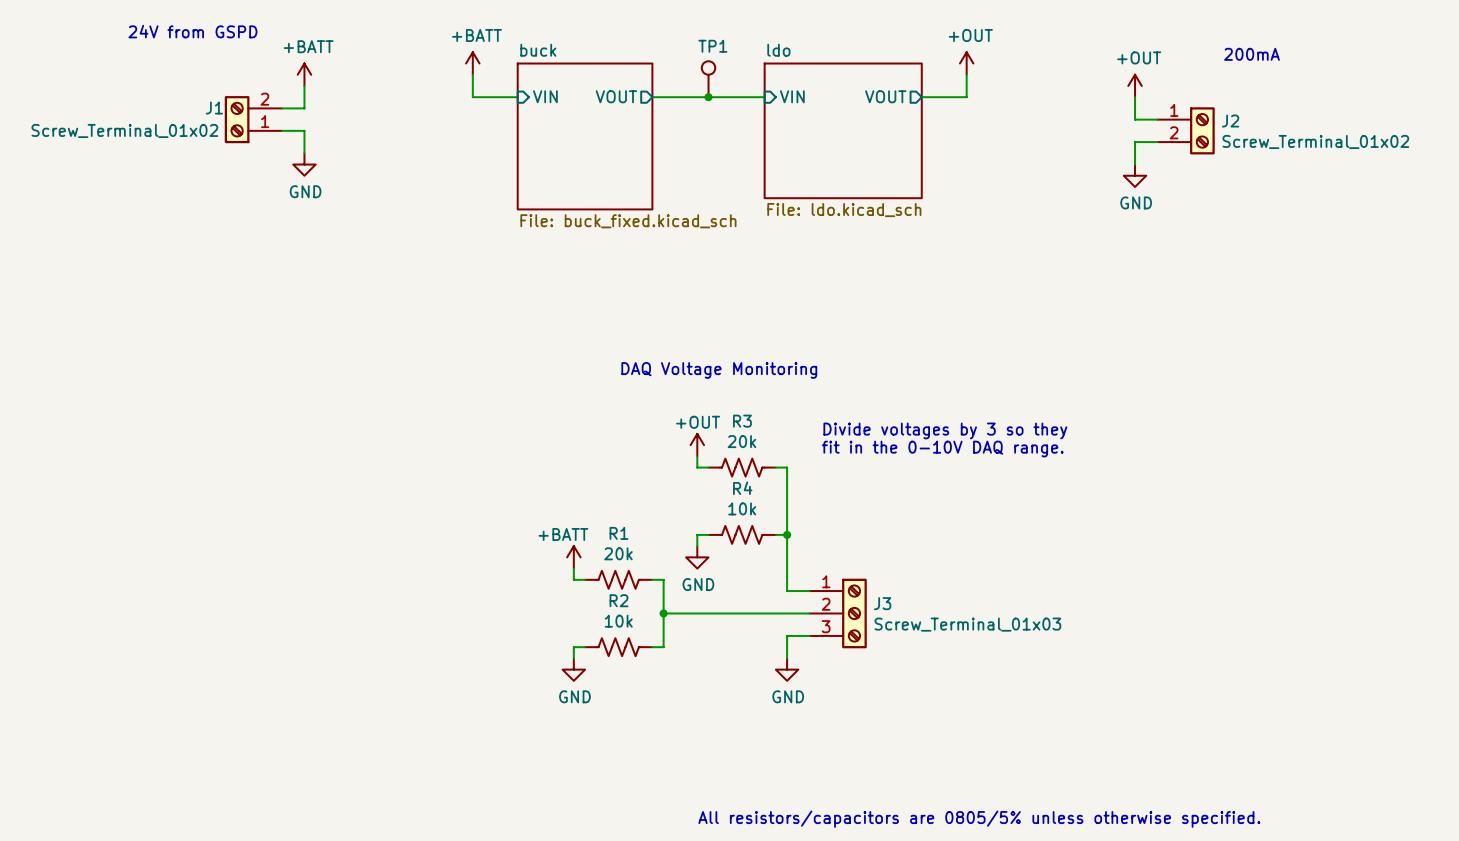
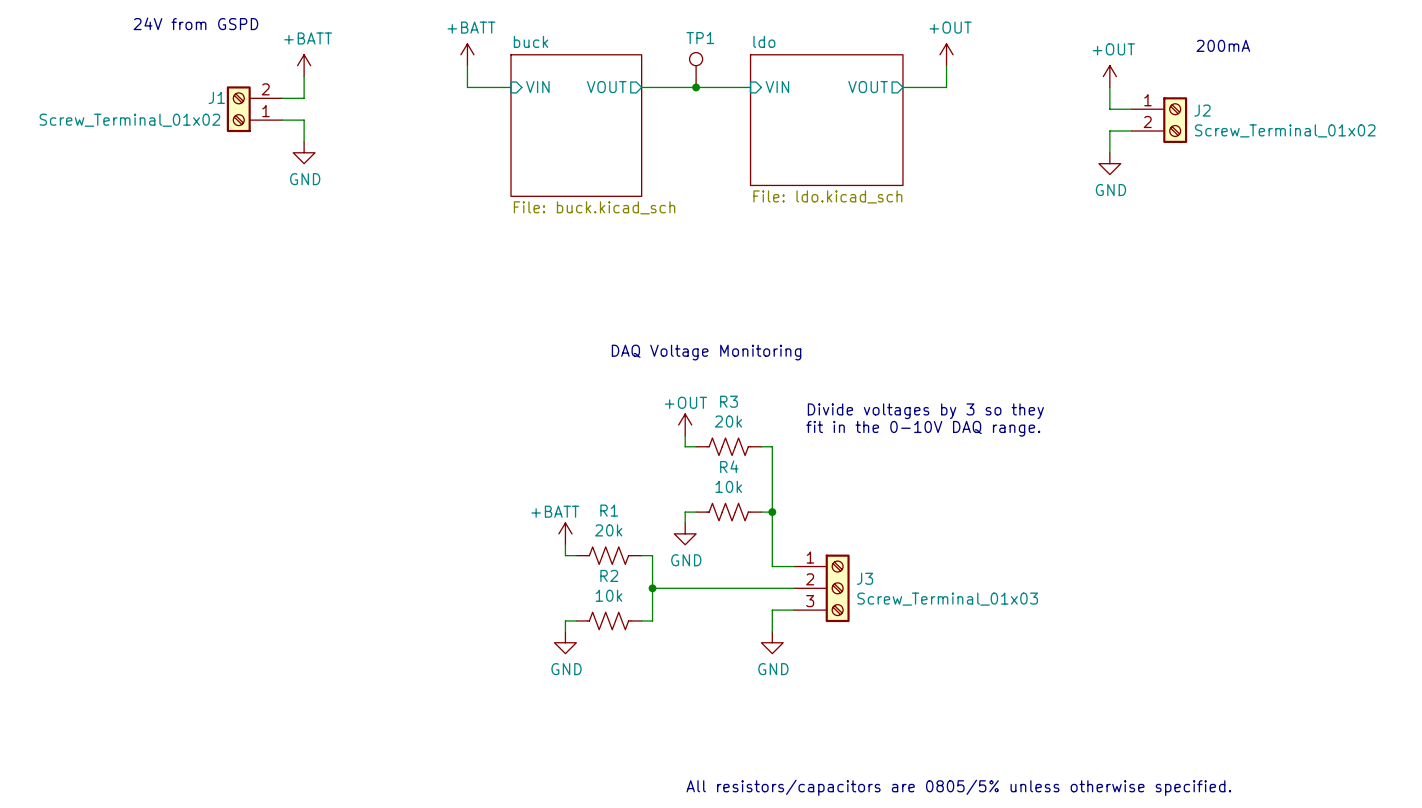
sheet buck value: File: buck_fixed.kicad_sch (628, 221) -> File: buck.kicad_sch (594, 207)

